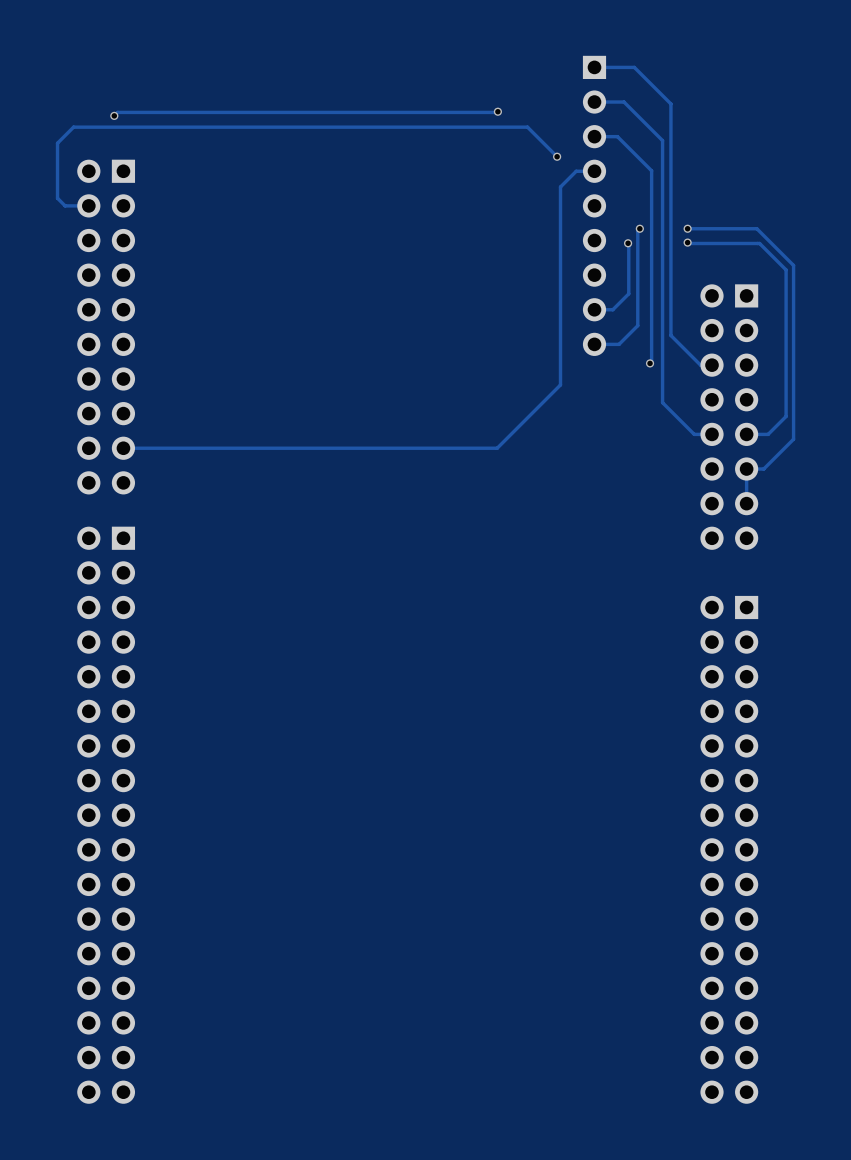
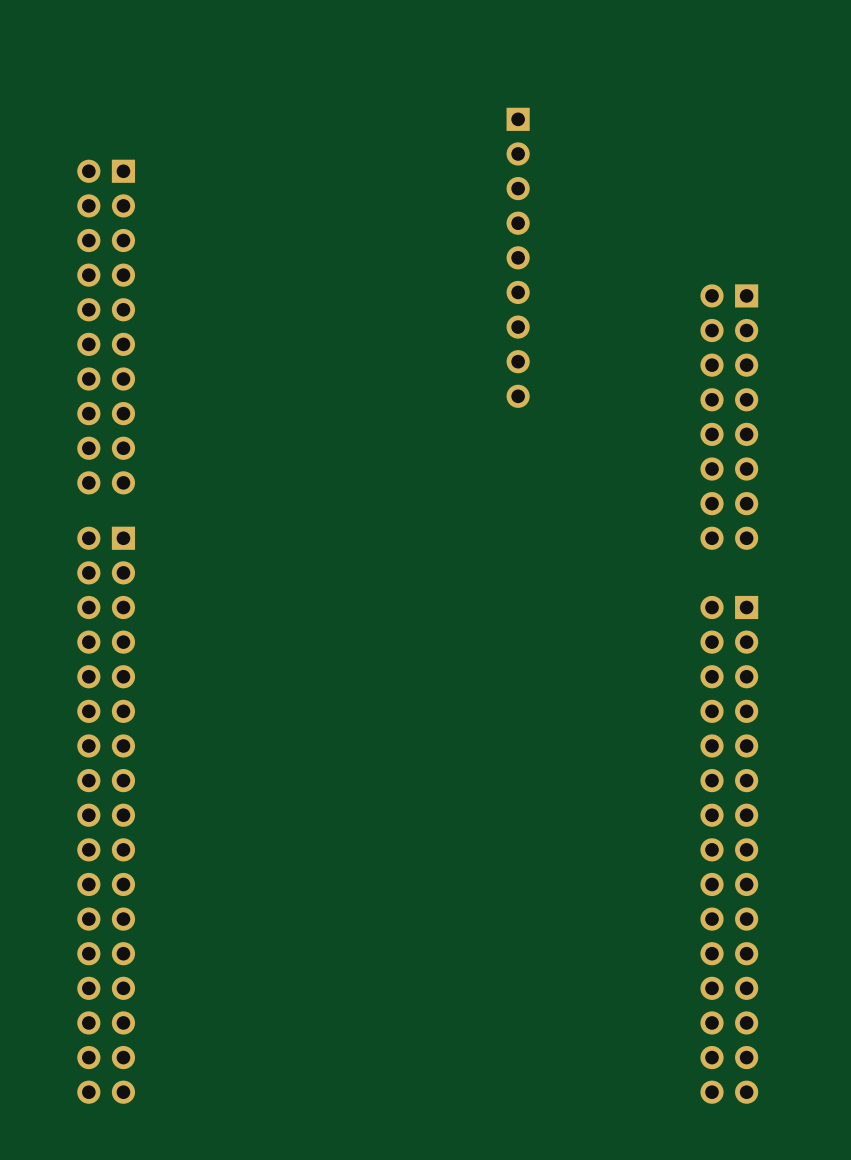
track: (594, 67) (634, 67) (670, 103) (670, 335) (700, 365) (712, 365) -> none
track: (594, 102) (624, 102) (662, 140) (662, 402) (694, 434) (712, 434) -> none
track: (497, 111) (117, 112) (114, 115) -> none
via: (497, 111) -> none
via: (114, 115) -> none
track: (594, 136) (617, 136) (651, 170) (651, 361) (650, 363) -> none
track: (557, 156) (527, 127) (73, 127) (57, 143) (57, 198) (65, 205) (88, 205) -> none
via: (557, 156) -> none
track: (594, 171) (576, 171) (560, 186) (560, 384) (497, 448) (123, 448) -> none
part position: (594, 205) -> (518, 257)
track: (639, 228) (637, 230) (637, 325) (619, 344) (594, 344) -> none
via: (639, 228) -> none
track: (687, 228) (756, 228) (793, 265) (793, 439) (763, 469) (746, 469) (746, 503) -> none
via: (687, 228) -> none
track: (687, 242) (759, 243) (786, 269) (786, 416) (768, 434) (746, 434) -> none
via: (687, 242) -> none
track: (628, 243) (628, 293) (612, 309) (594, 309) -> none
via: (628, 243) -> none
via: (650, 363) -> none

